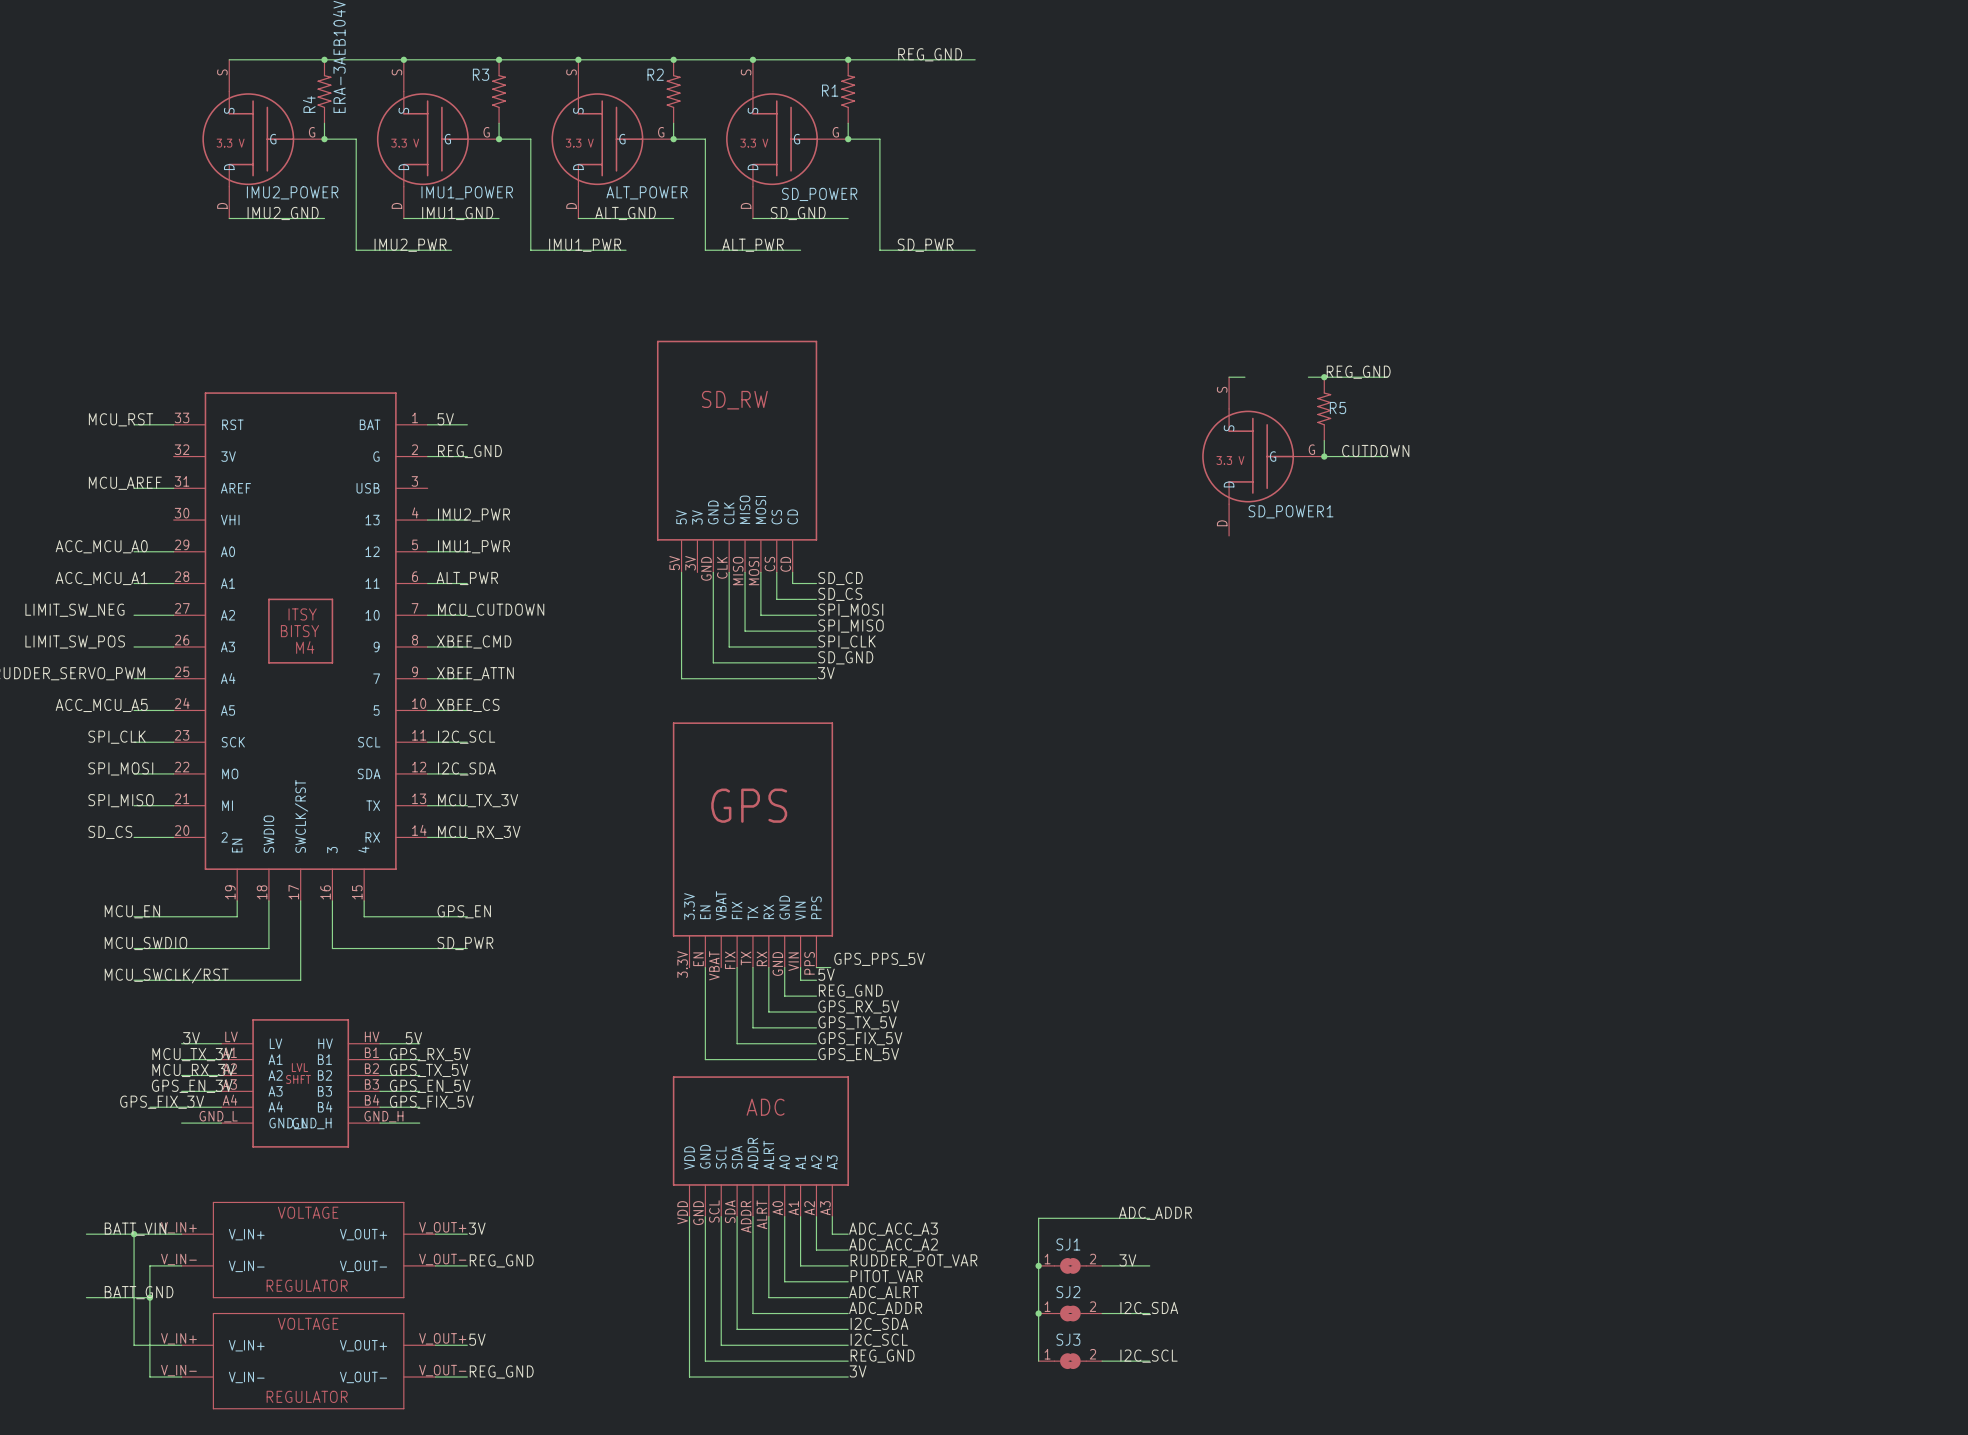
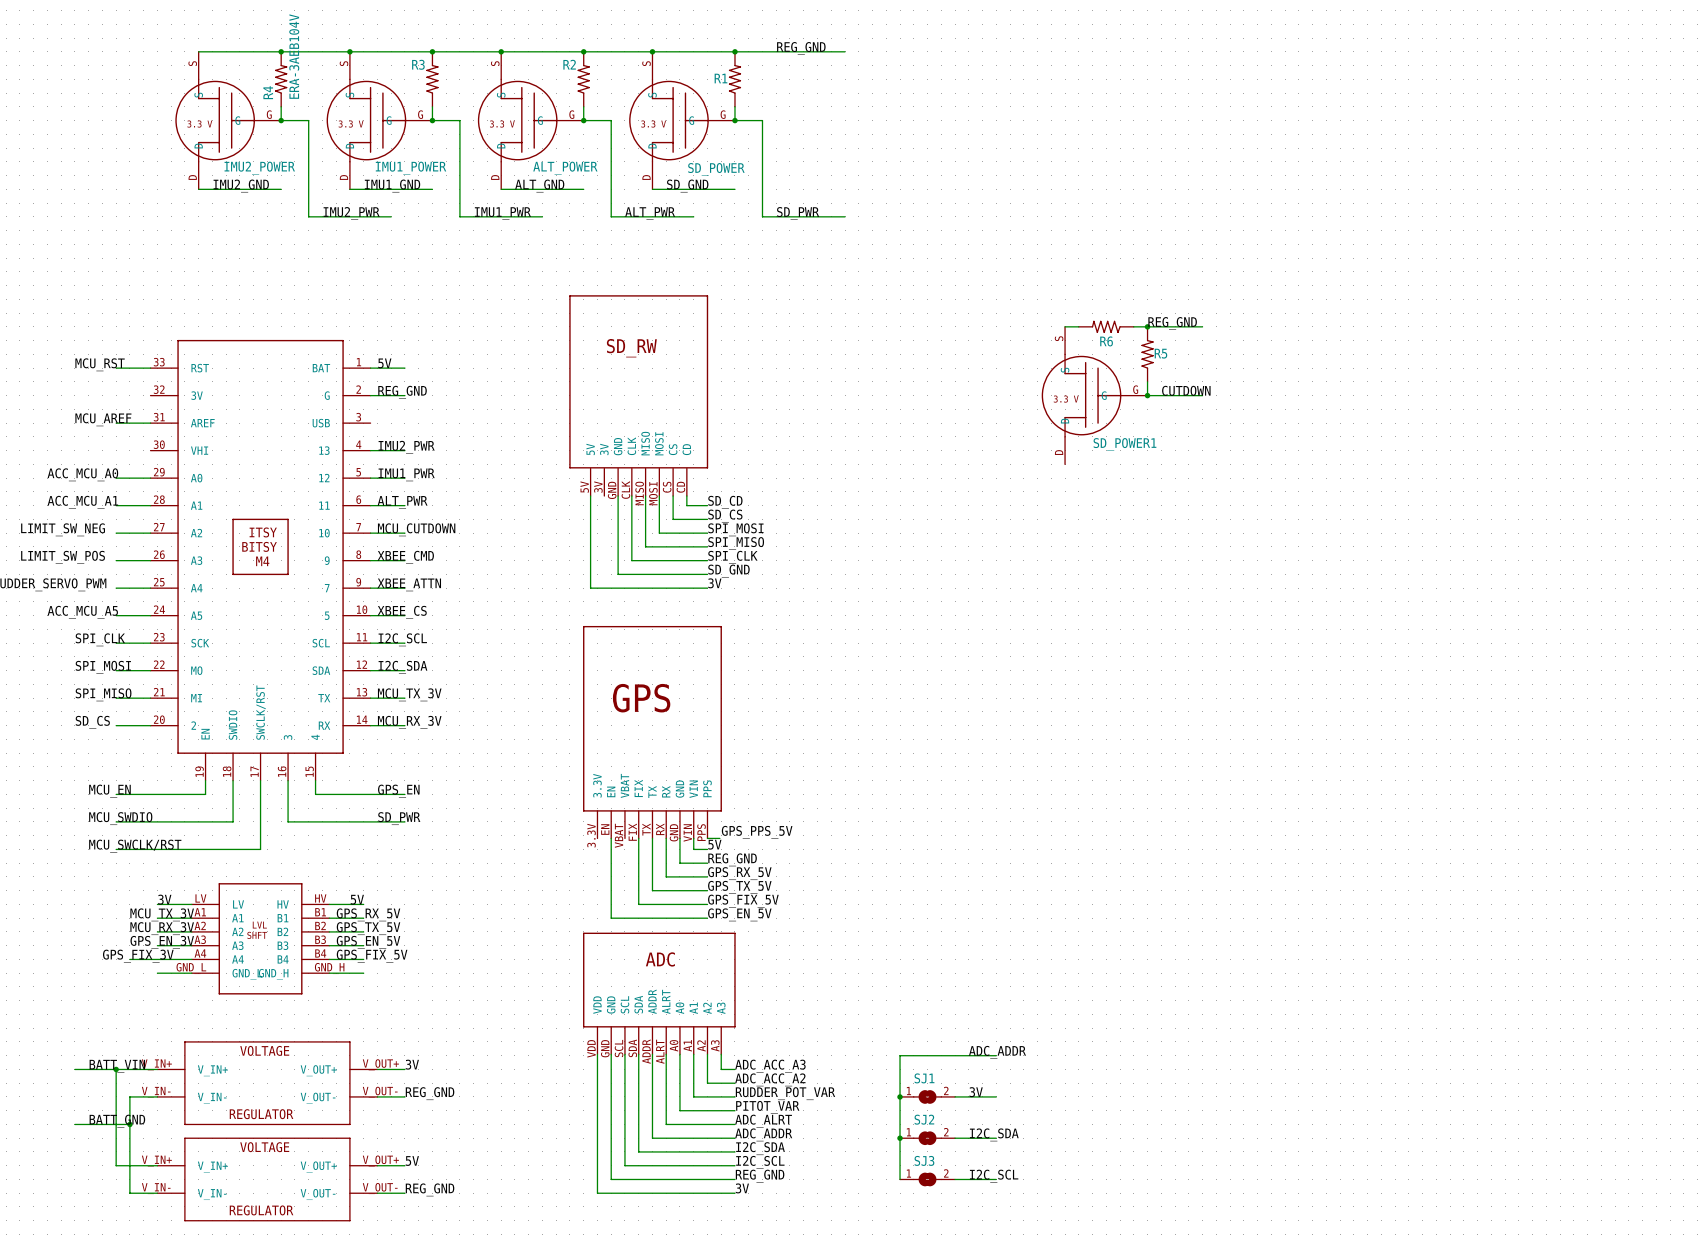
R6: none -> (1106, 326)

